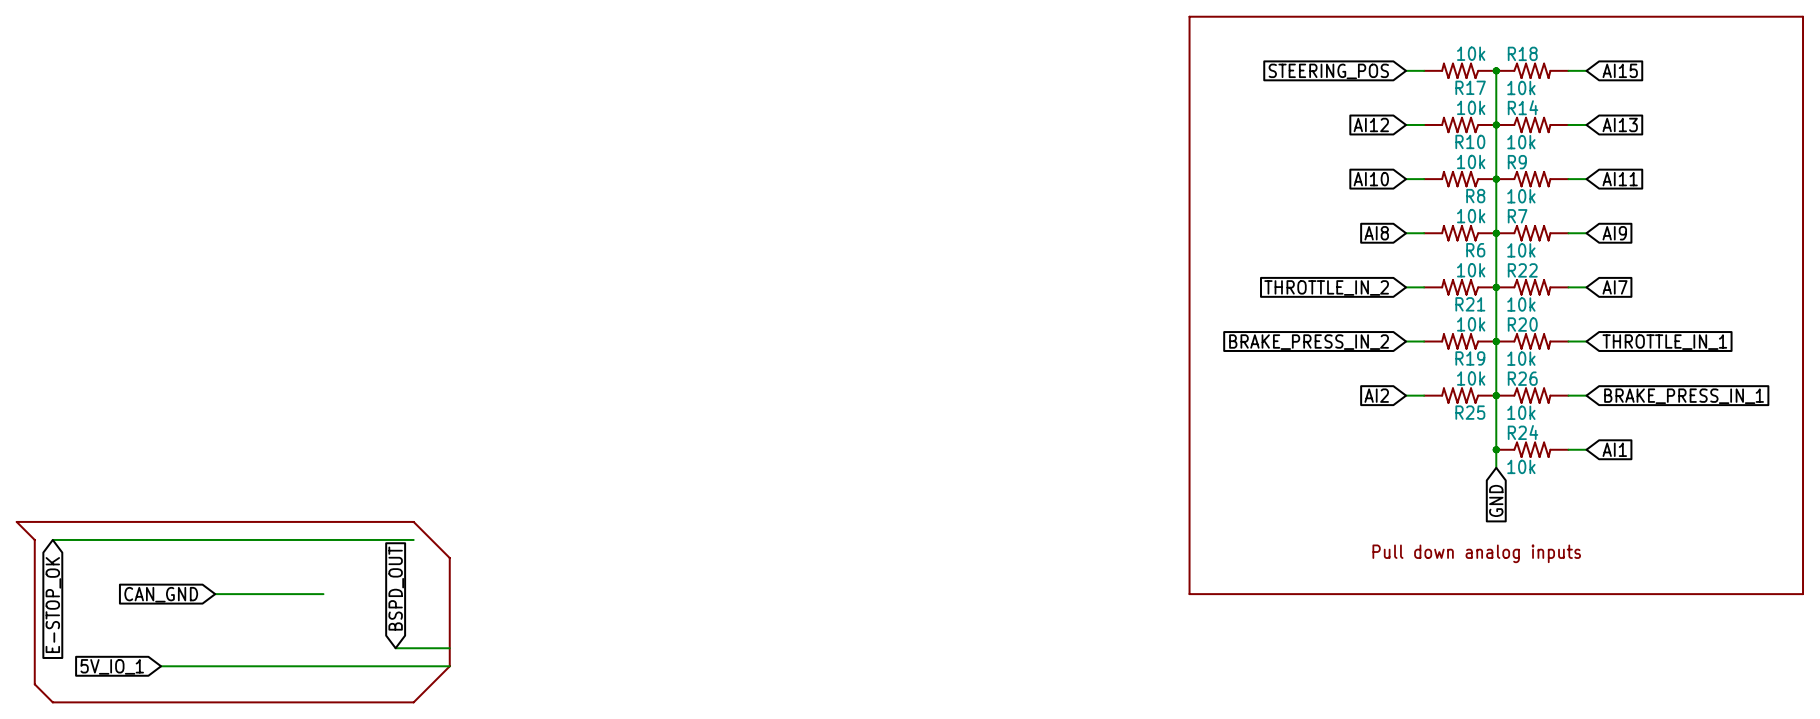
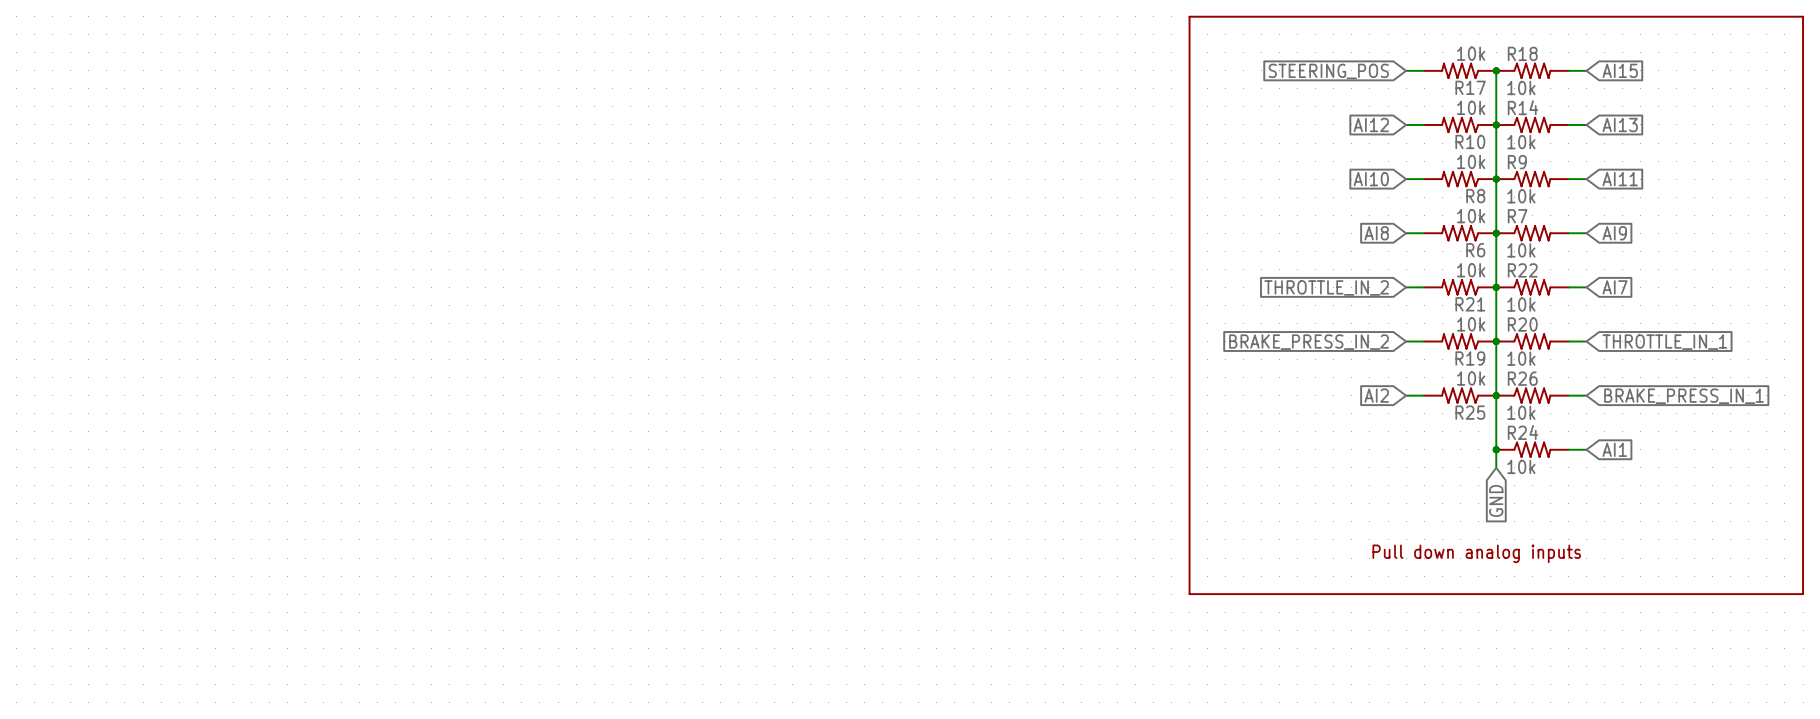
line: (16, 521) (413, 521) (449, 558) (449, 666) (413, 702) (52, 702) (34, 684) (34, 539) (16, 521) -> none
wire: (52, 539) (413, 539) -> none
global label: BSPD_OUT (396, 588) -> none
global label: CAN_GND (161, 594) -> none
wire: (215, 594) (323, 594) -> none
global label: E-STOP_OK (53, 605) -> none
wire: (395, 648) (449, 648) -> none
global label: 5V_IO_1 (112, 666) -> none
wire: (161, 666) (449, 666) -> none

